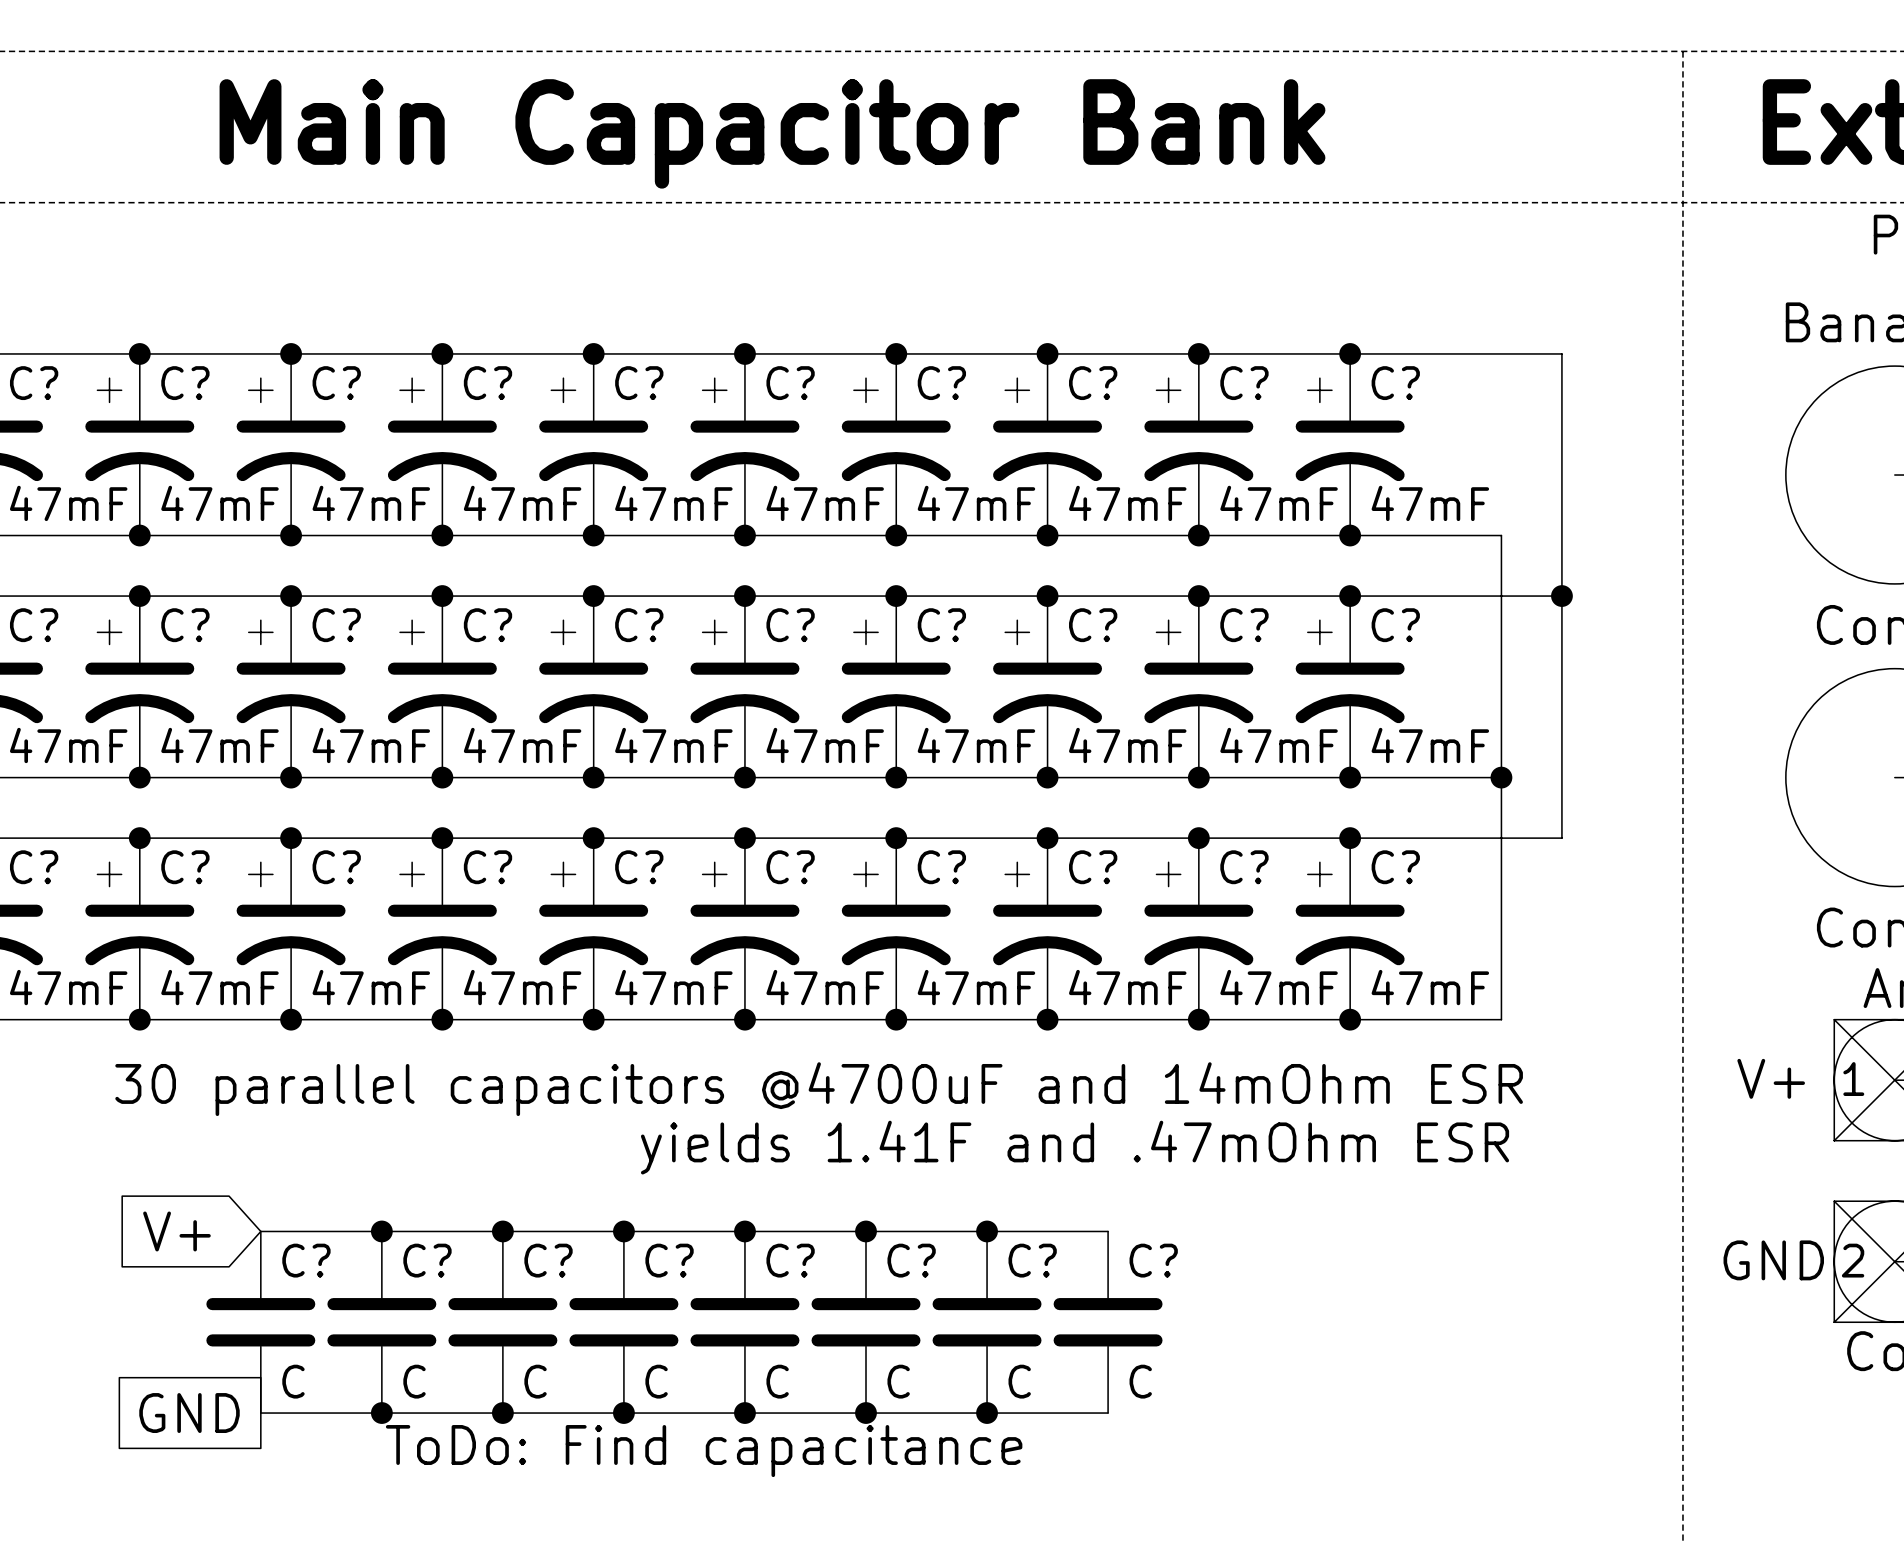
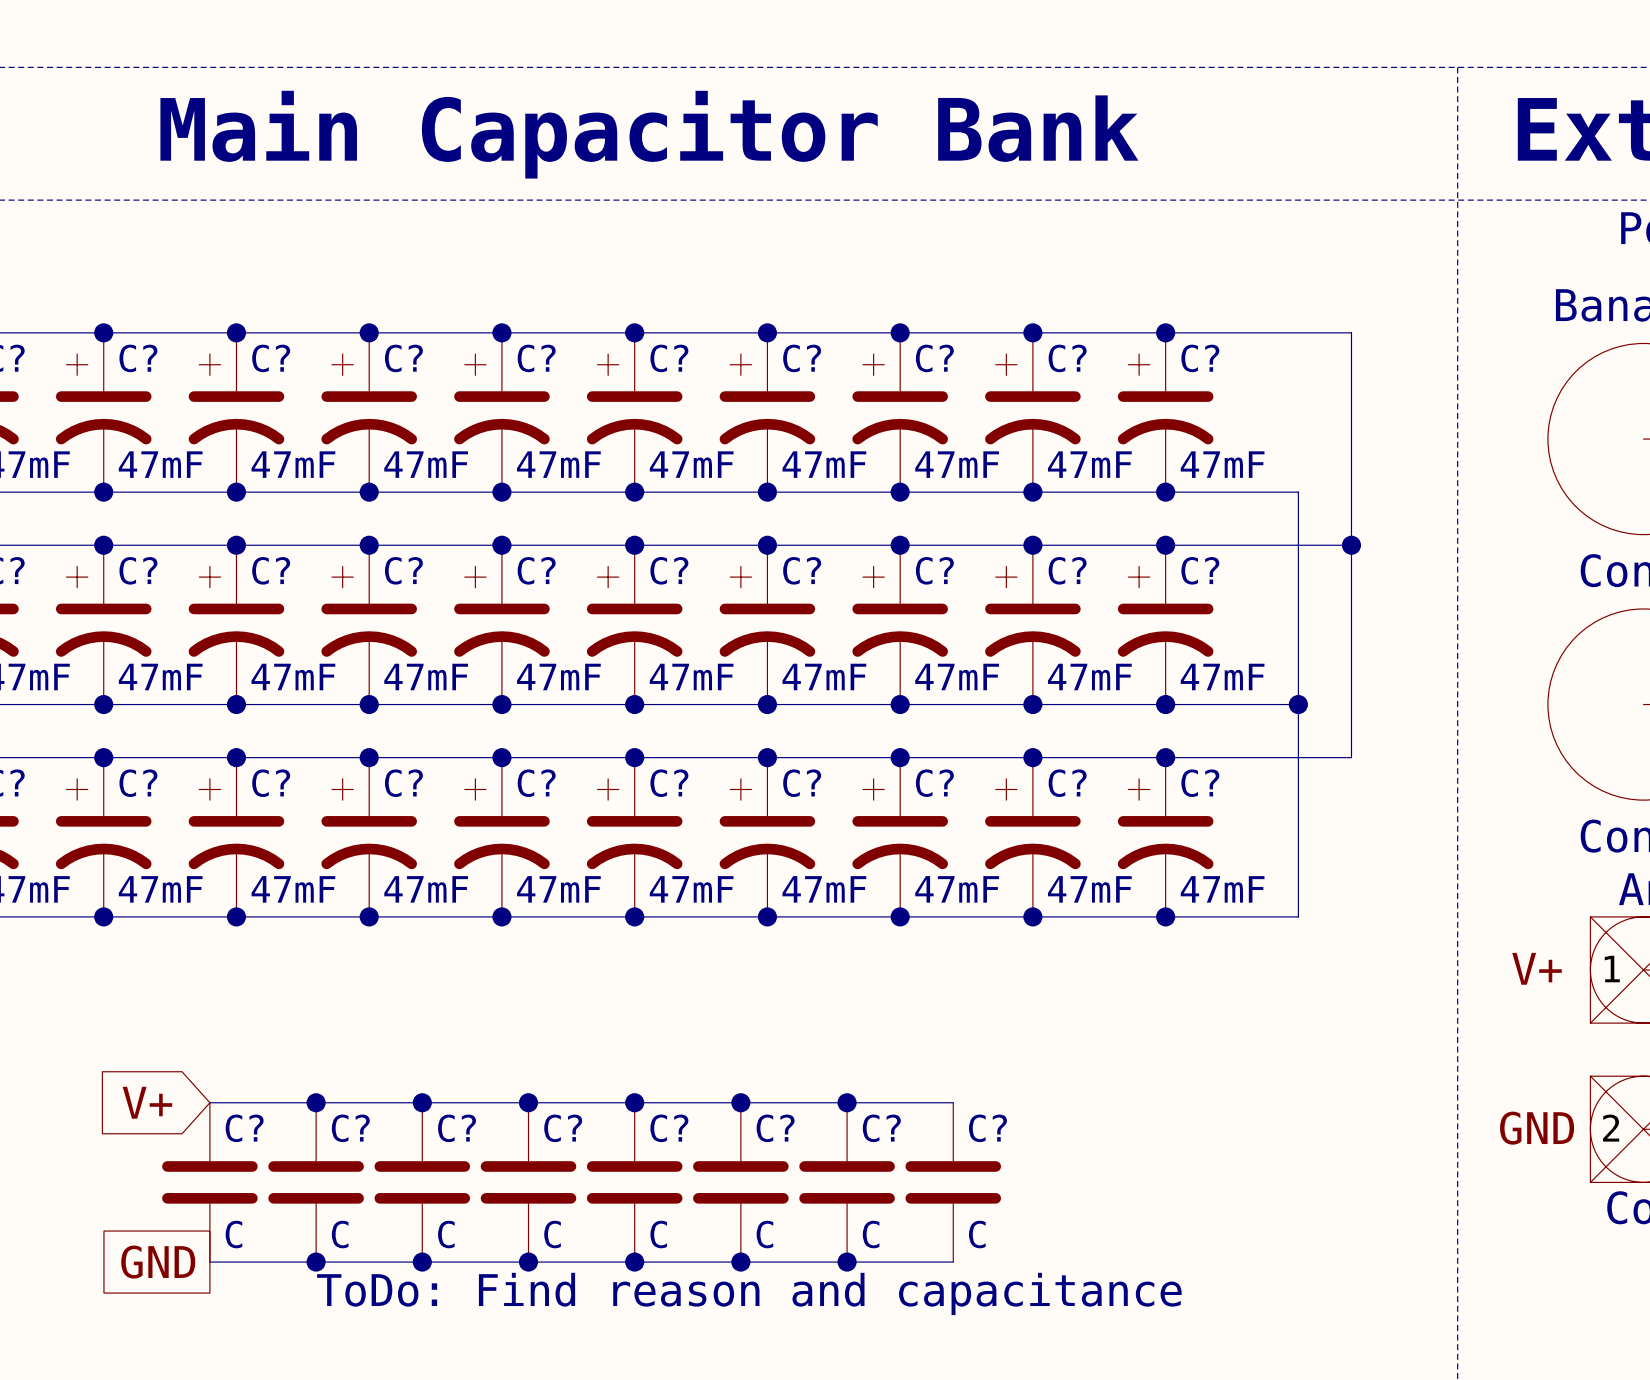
text: 30 parallel capacitors @4700uF and 14mOhm ESR (819, 1089) -> none
text: yields 1.41F and .47mOhm ESR (1075, 1147) -> none
text: ToDo: Find capacitance (704, 1451) -> ToDo: Find reason and capacitance (749, 1293)

